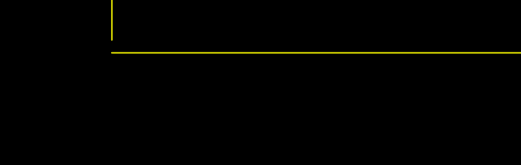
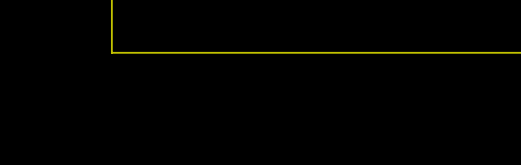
board edge: none -> (111, 39) (111, 52)

